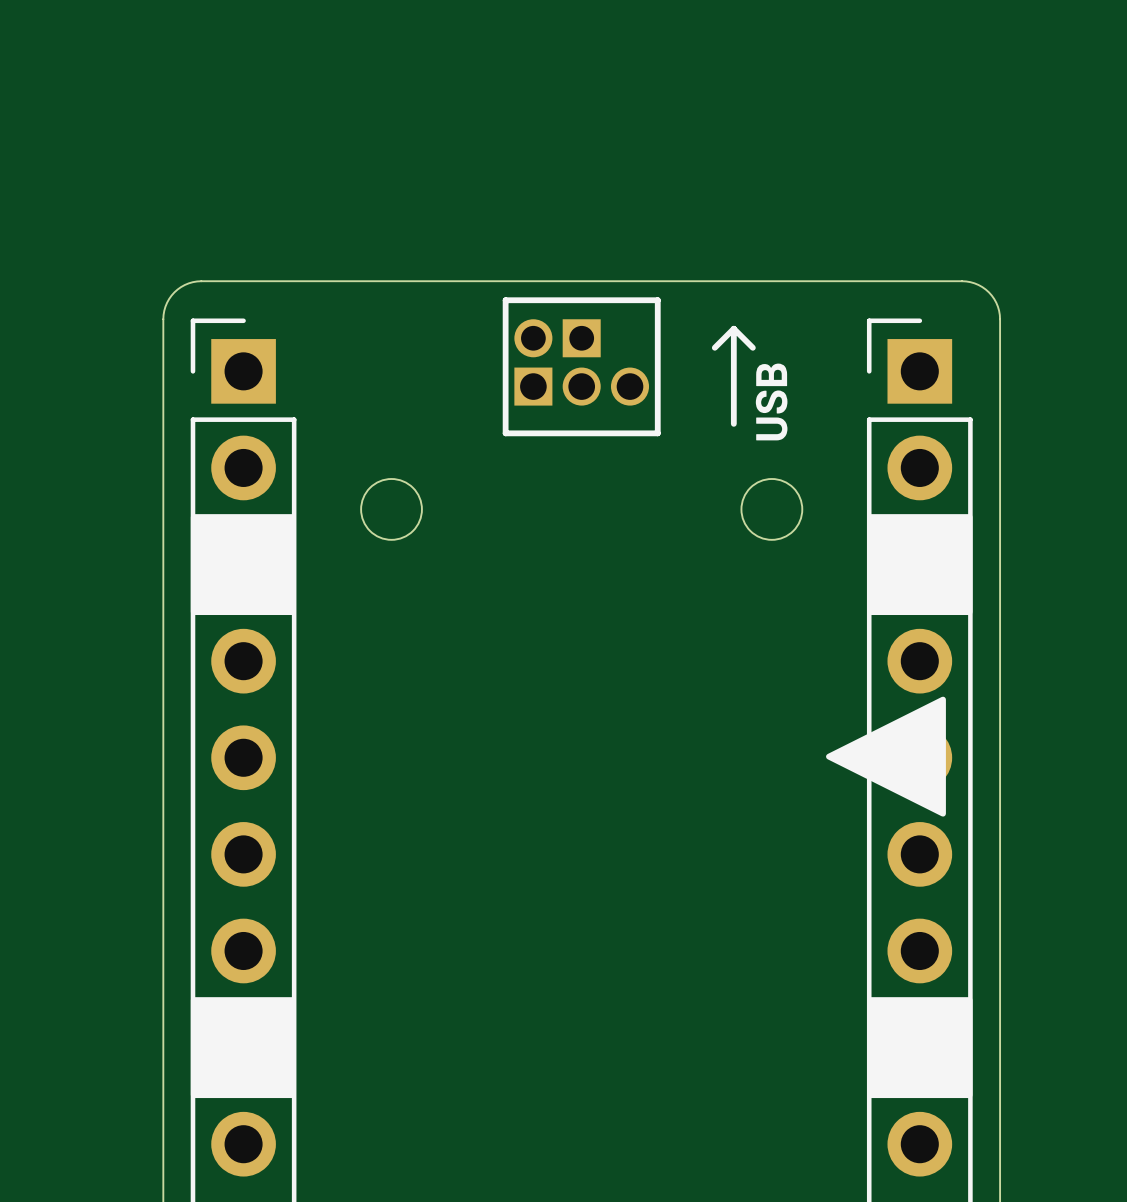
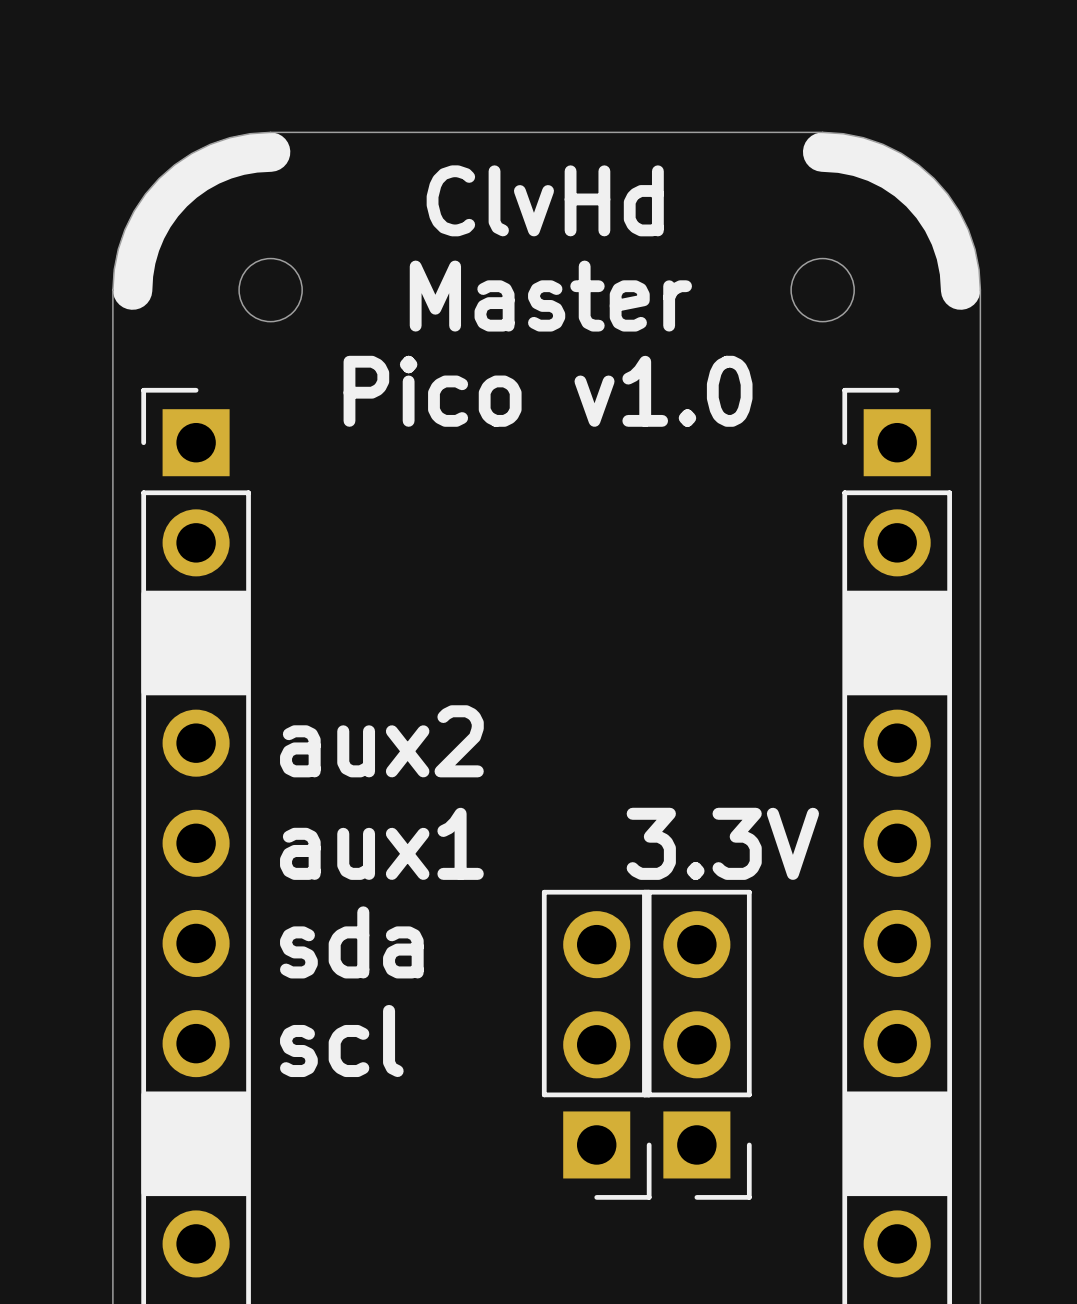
line: none -> (270, 152) (239, 155) (210, 165) (197, 173) (173, 192) (153, 216) (146, 230) (136, 259) (132, 290)
line: none -> (822, 152) (858, 156) (875, 162) (891, 170) (920, 192) (932, 206) (950, 237) (955, 254) (960, 290)
text: none -> ClvHd (545, 200)
round board edge: none -> [238, 257, 303, 323]
round board edge: none -> [790, 257, 855, 323]
text: none -> Master (550, 296)
line: (505, 300) (657, 300) (657, 433) (505, 433) (505, 300) -> none
board edge: (163, 319) (165, 306) (174, 292) (184, 284) (201, 281) (962, 281) (978, 284) (988, 292) (996, 302) (1000, 319) -> (112, 388) (114, 269) (118, 249) (134, 211) (159, 178) (191, 153) (229, 137) (270, 132) (822, 132) (843, 133) (883, 144) (918, 164) (934, 178) (947, 194) (968, 229) (979, 269) (980, 388)
text: none -> Pico v1.0 (548, 391)
line: (733, 328) (733, 423) -> none
line: (733, 328) (752, 347) -> none
line: (733, 328) (714, 347) -> none
part: (557, 338) -> none
part: (581, 386) -> none
text: USB (771, 401) -> none
round board edge: [360, 478, 423, 541] -> none
round board edge: [740, 478, 804, 541] -> none
text: none -> aux2 (381, 741)
drawing: [826, 696, 946, 817] -> none
text: none -> aux1 (381, 843)
text: none -> 3.3V (722, 843)
text: none -> sda (351, 942)
text: none -> scl (341, 1040)
part: none -> (596, 1044)
part: none -> (696, 1044)

